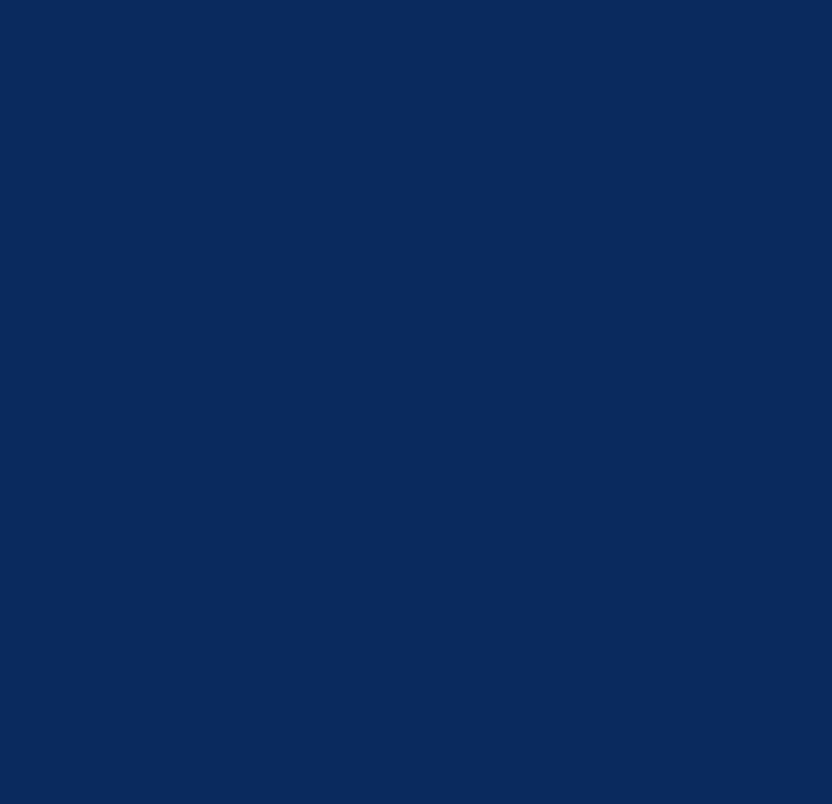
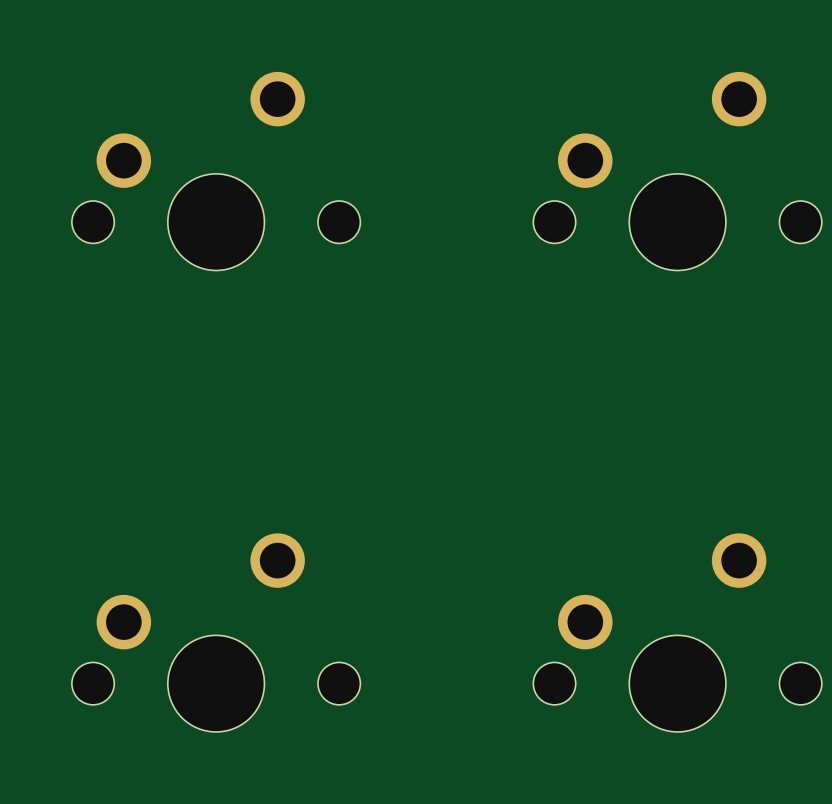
part: none -> (216, 171)
part: none -> (677, 171)
part: none -> (216, 632)
part: none -> (677, 632)

